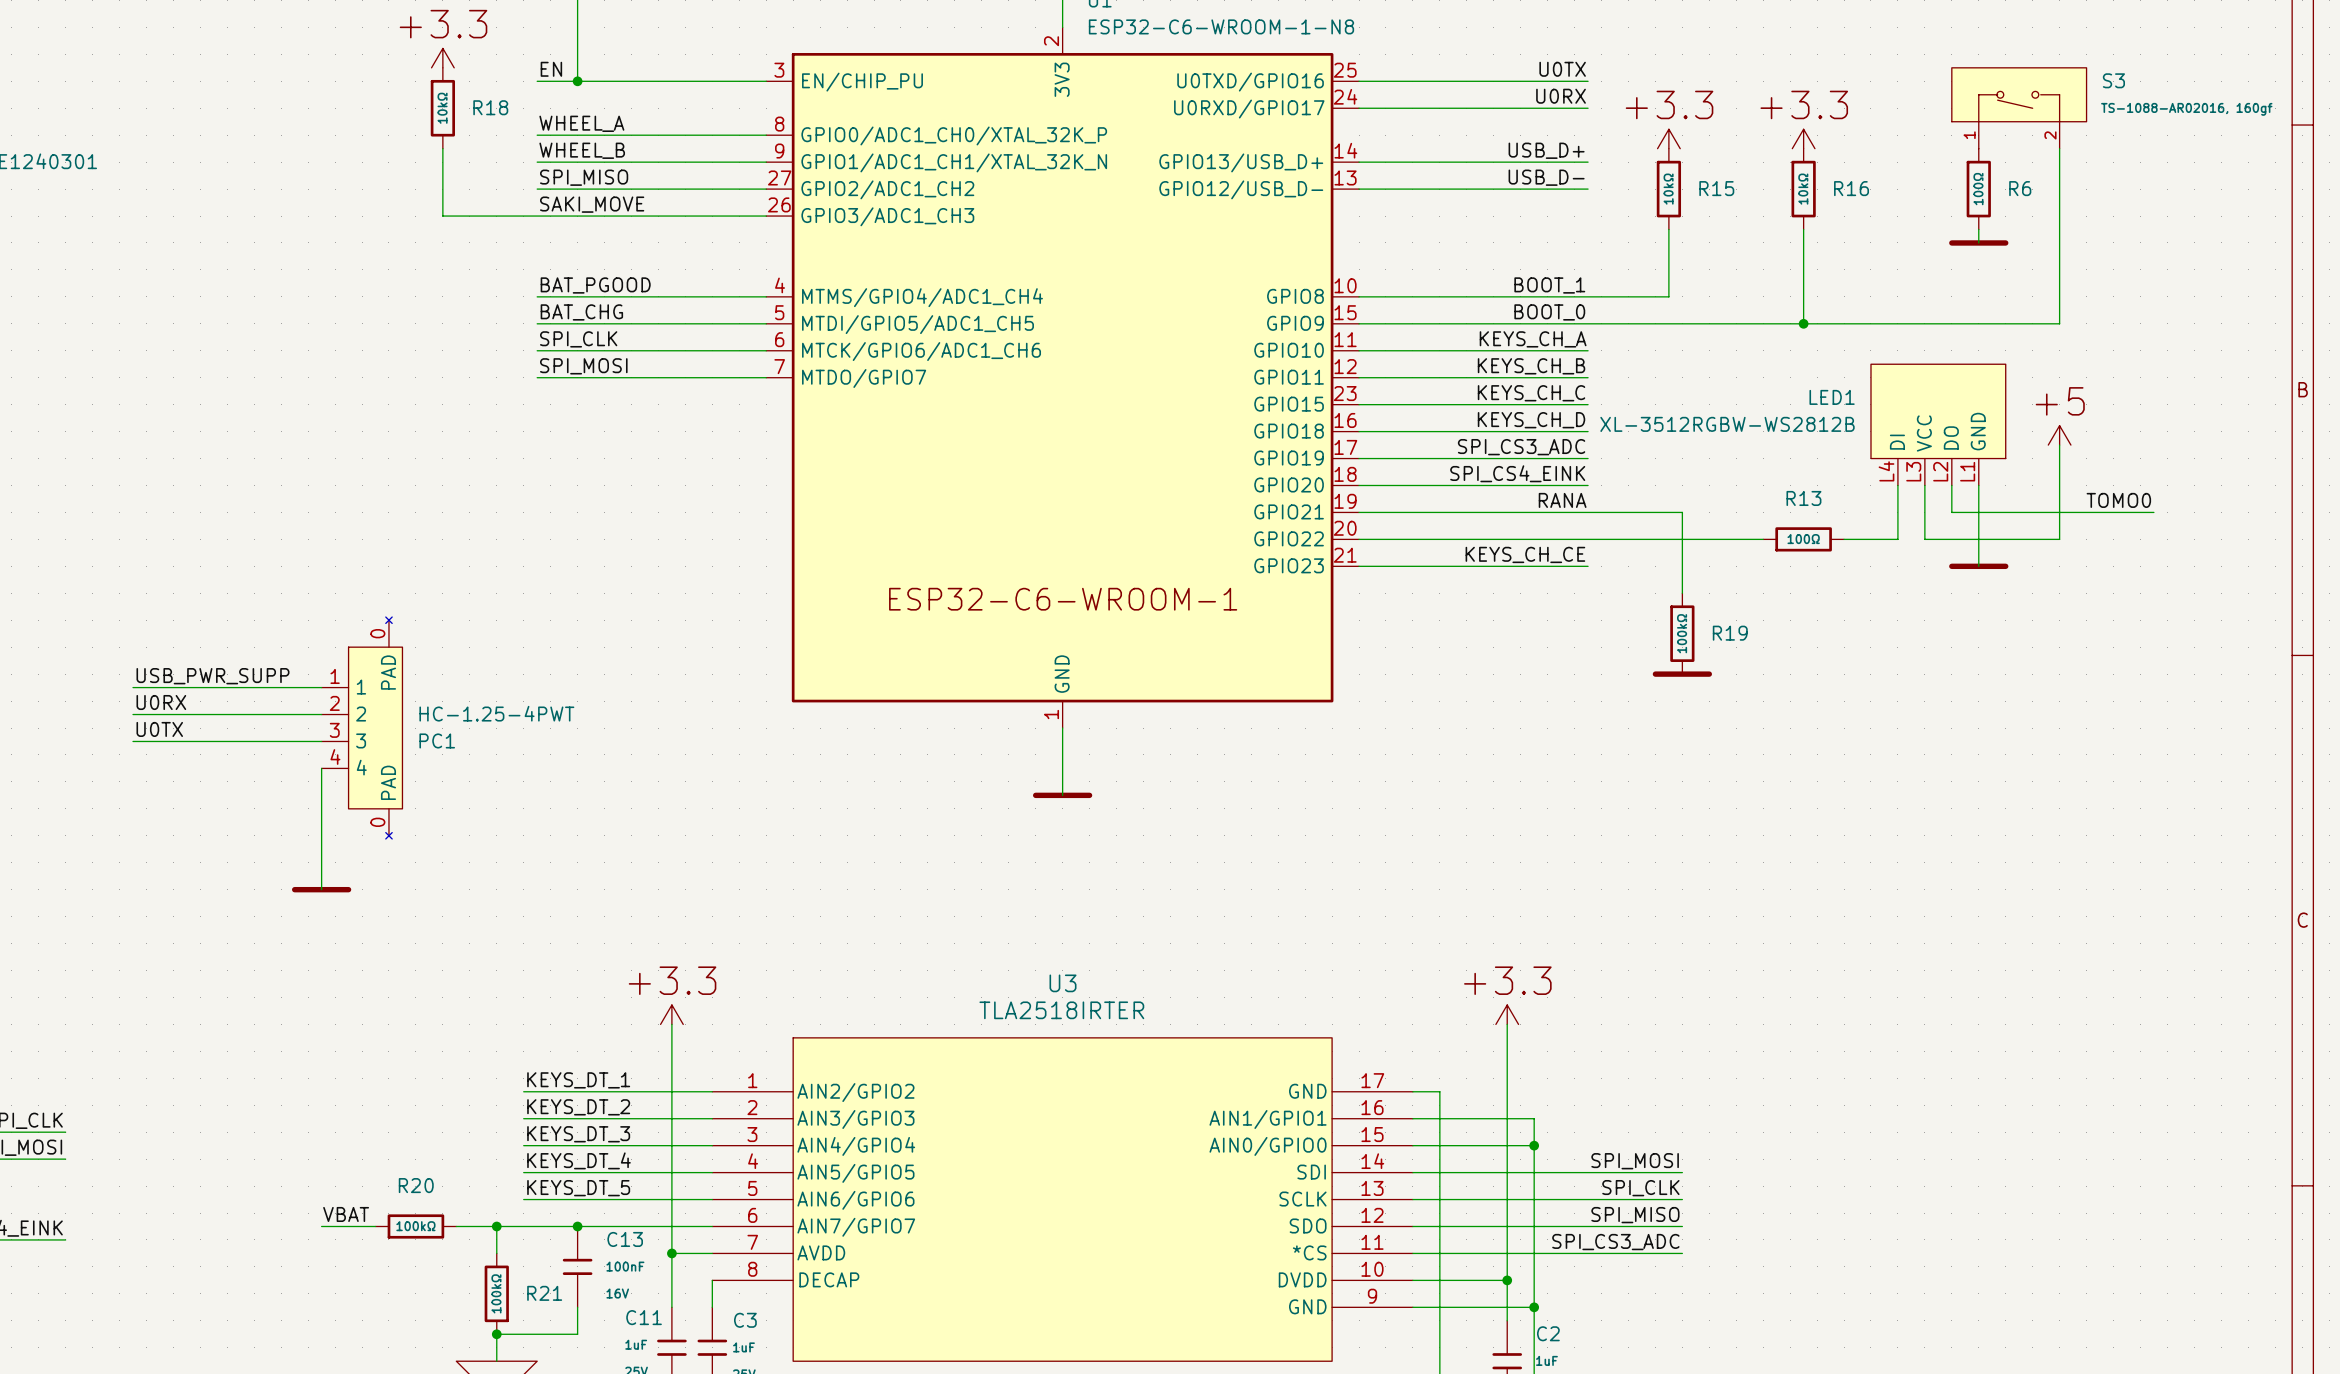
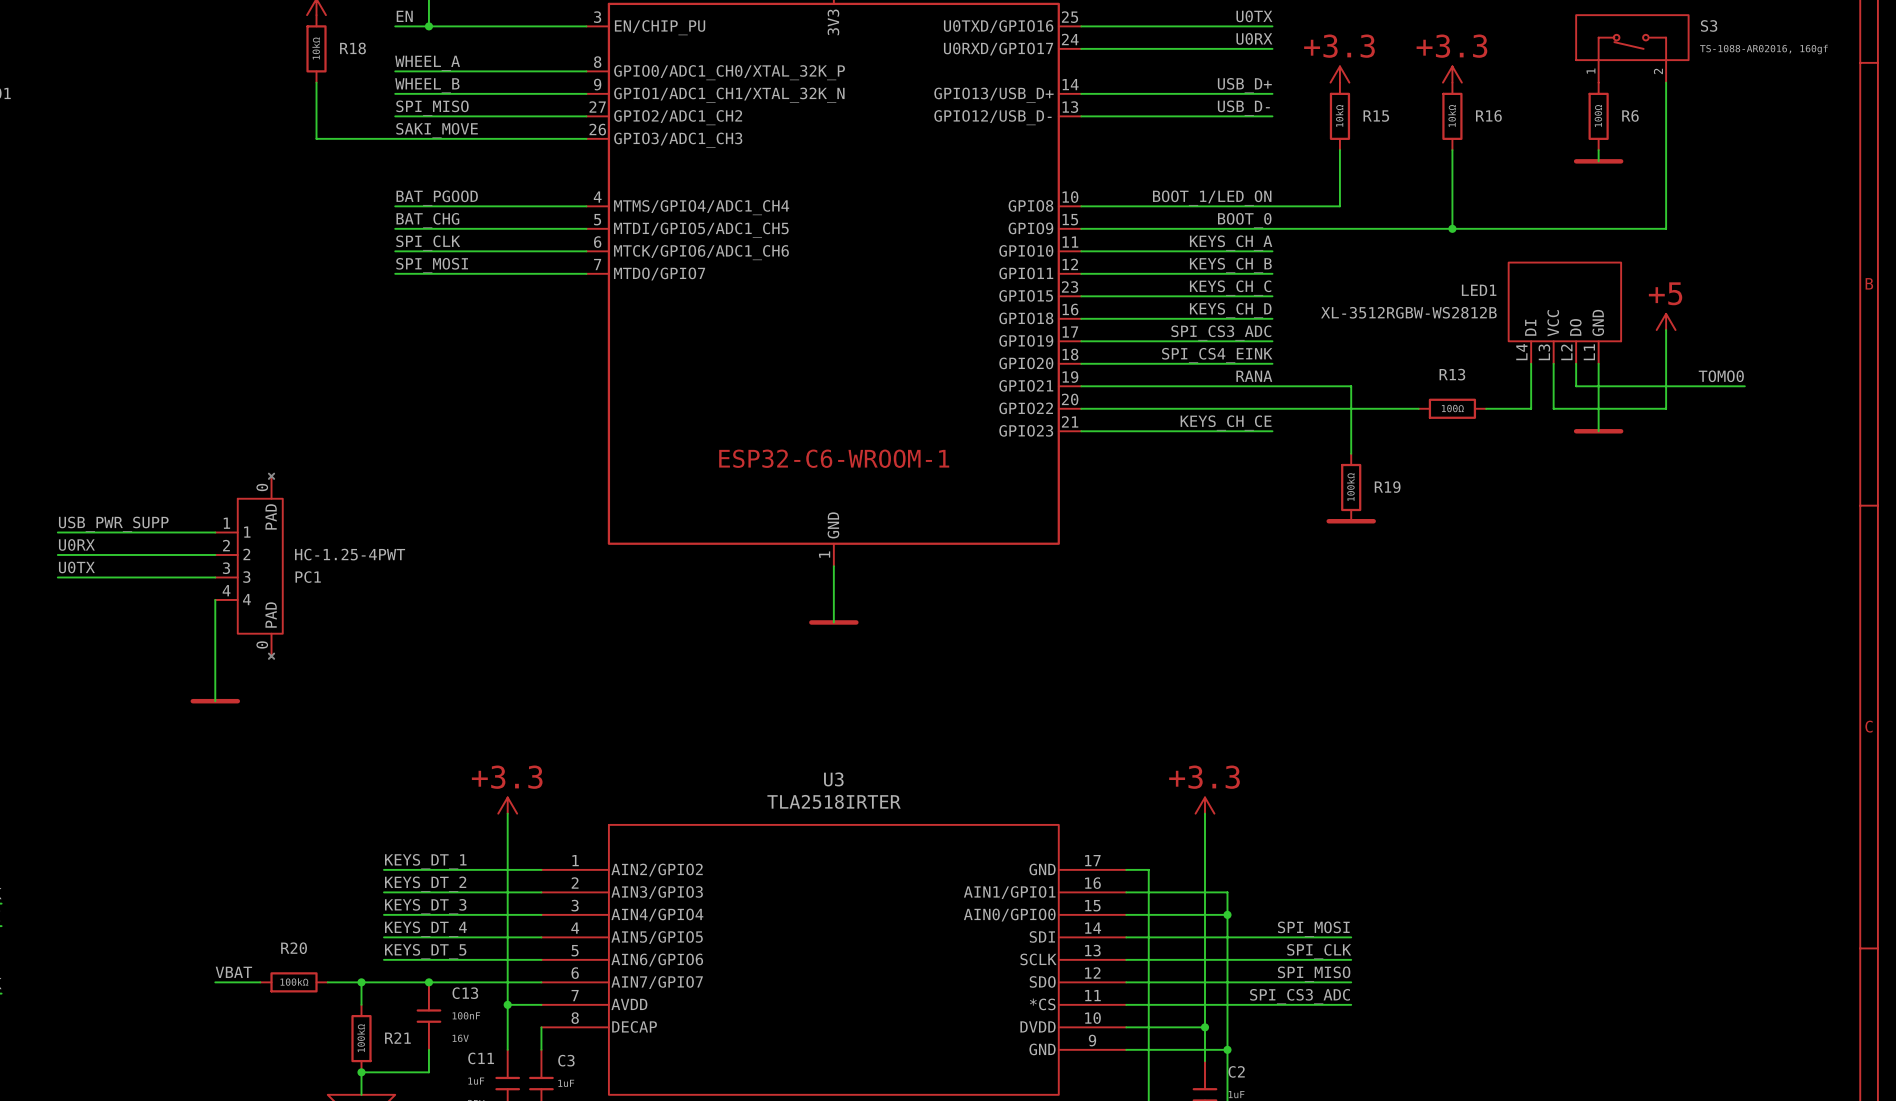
label: BOOT_1 (1549, 285) -> BOOT_1/LED_ON (1212, 198)

